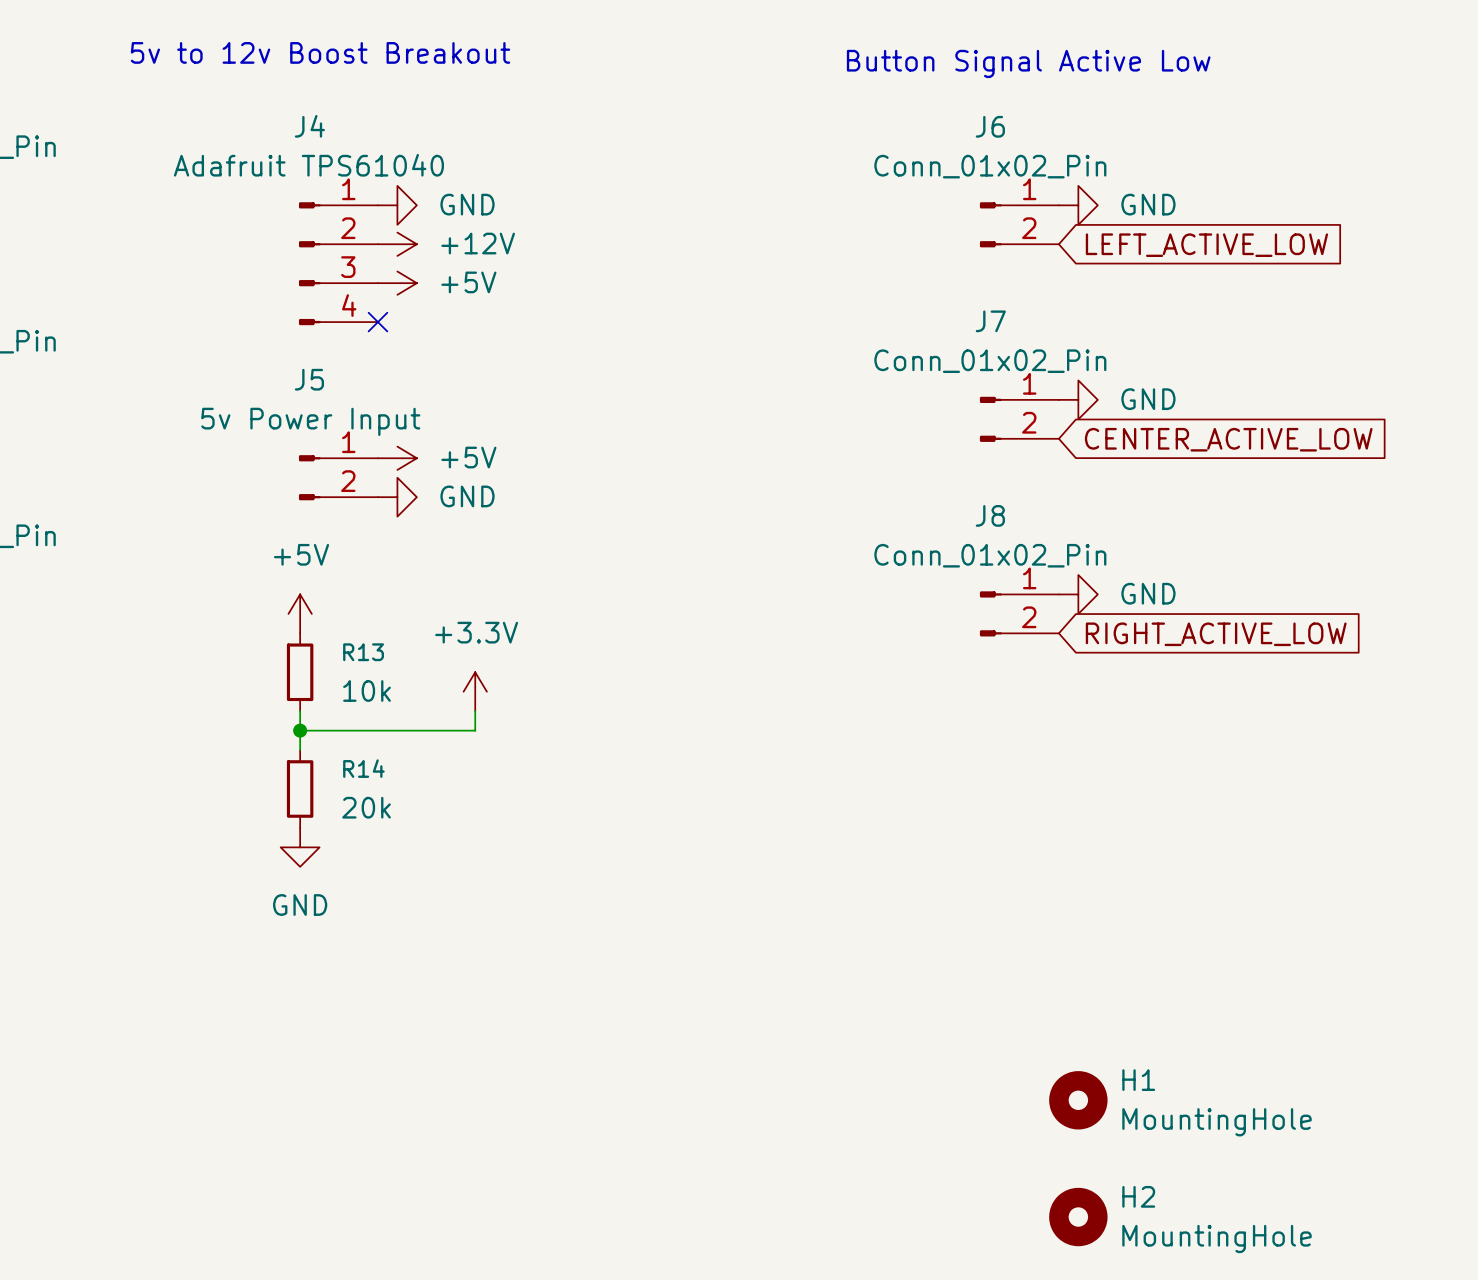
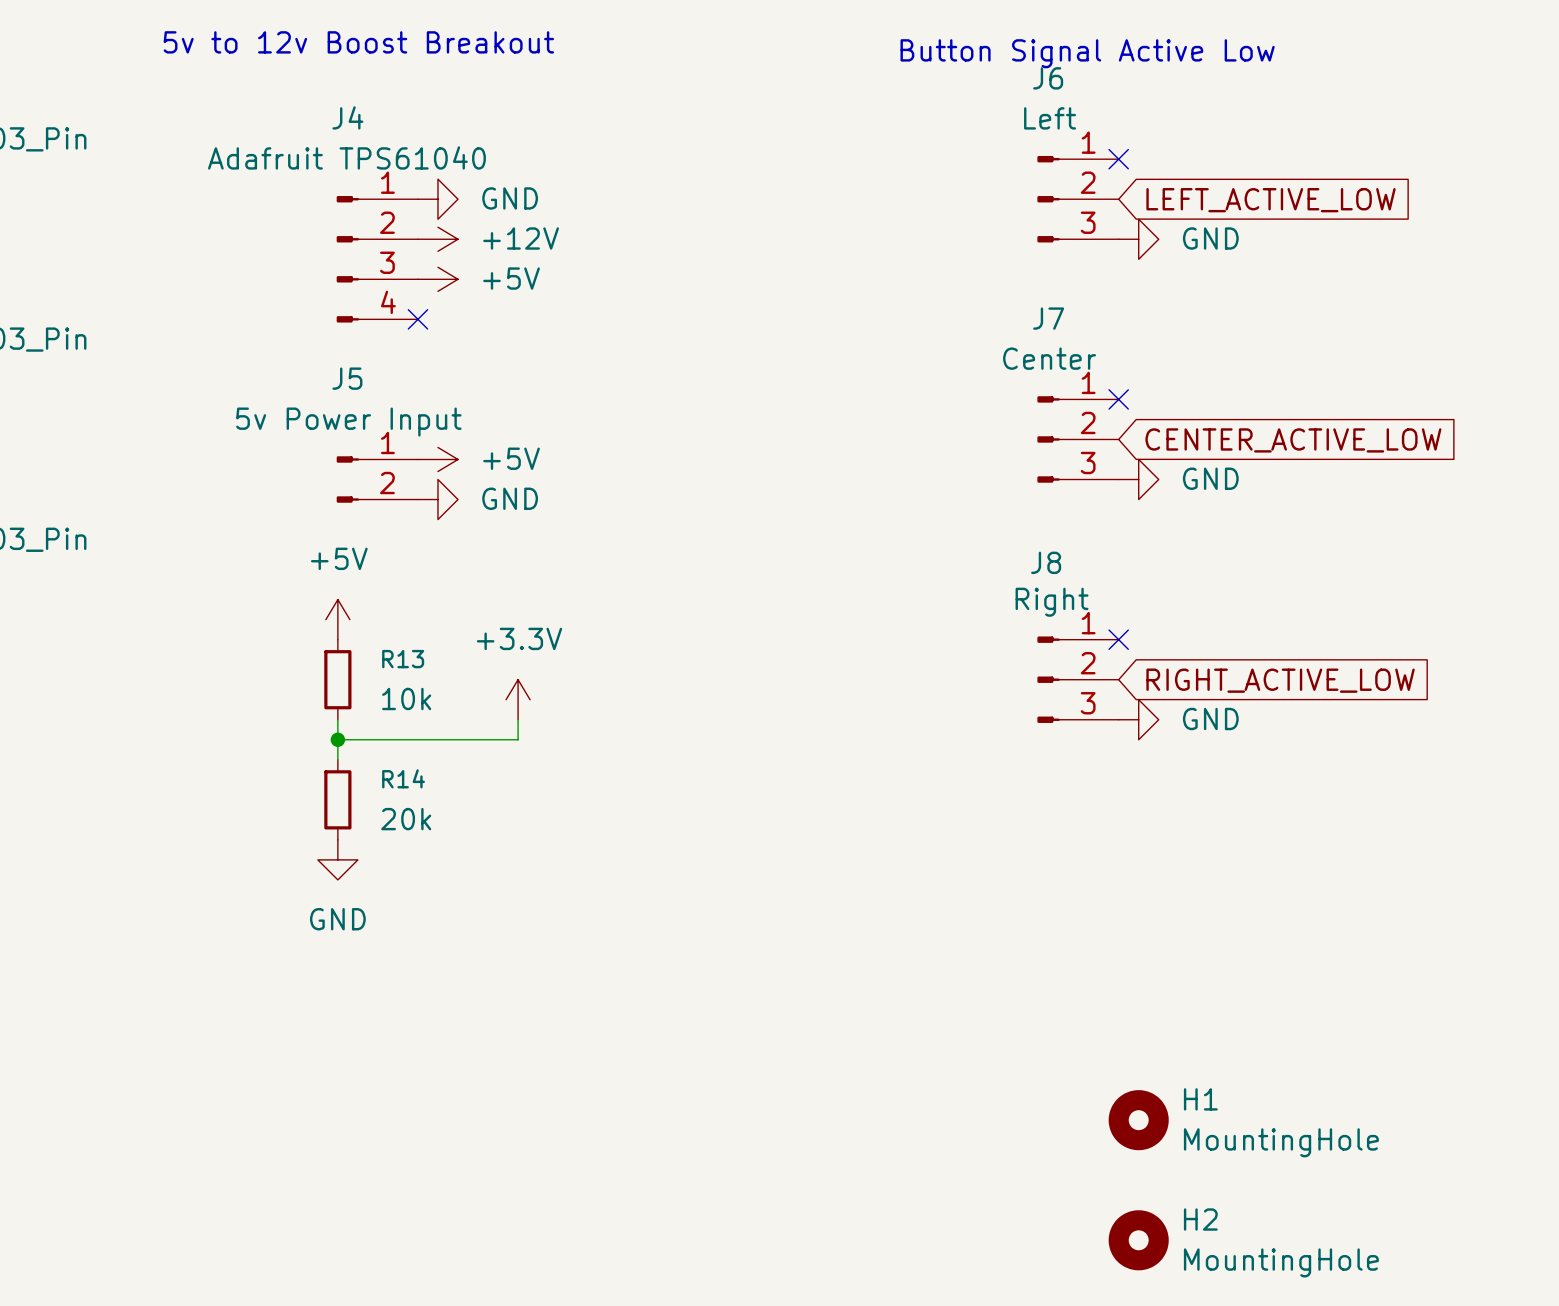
J6 value: Conn_01x02_Pin (990, 166) -> Left (1050, 118)
no-connect mark: none -> (1118, 159)
J6 symbol: [979, 202, 1059, 248] -> [1037, 155, 1119, 243]
power symbol position: GND (1078, 205) -> GND (1138, 239)
global label position: LEFT_ACTIVE_LOW (1206, 245) -> LEFT_ACTIVE_LOW (1271, 200)
J7 value: Conn_01x02_Pin (990, 361) -> Center (1049, 358)
J7 symbol: [979, 396, 1059, 442] -> [1037, 396, 1119, 483]
no-connect mark: none -> (1118, 399)
power symbol: GND (1078, 399) -> none
power symbol: none -> GND (1138, 479)
J8 value: Conn_01x02_Pin (990, 555) -> Right (1052, 602)
J8 symbol: [979, 591, 1059, 637] -> [1037, 636, 1119, 723]
power symbol: GND (1078, 594) -> none
no-connect mark: none -> (1118, 639)
global label position: RIGHT_ACTIVE_LOW (1216, 634) -> RIGHT_ACTIVE_LOW (1280, 680)
power symbol: none -> GND (1138, 719)

